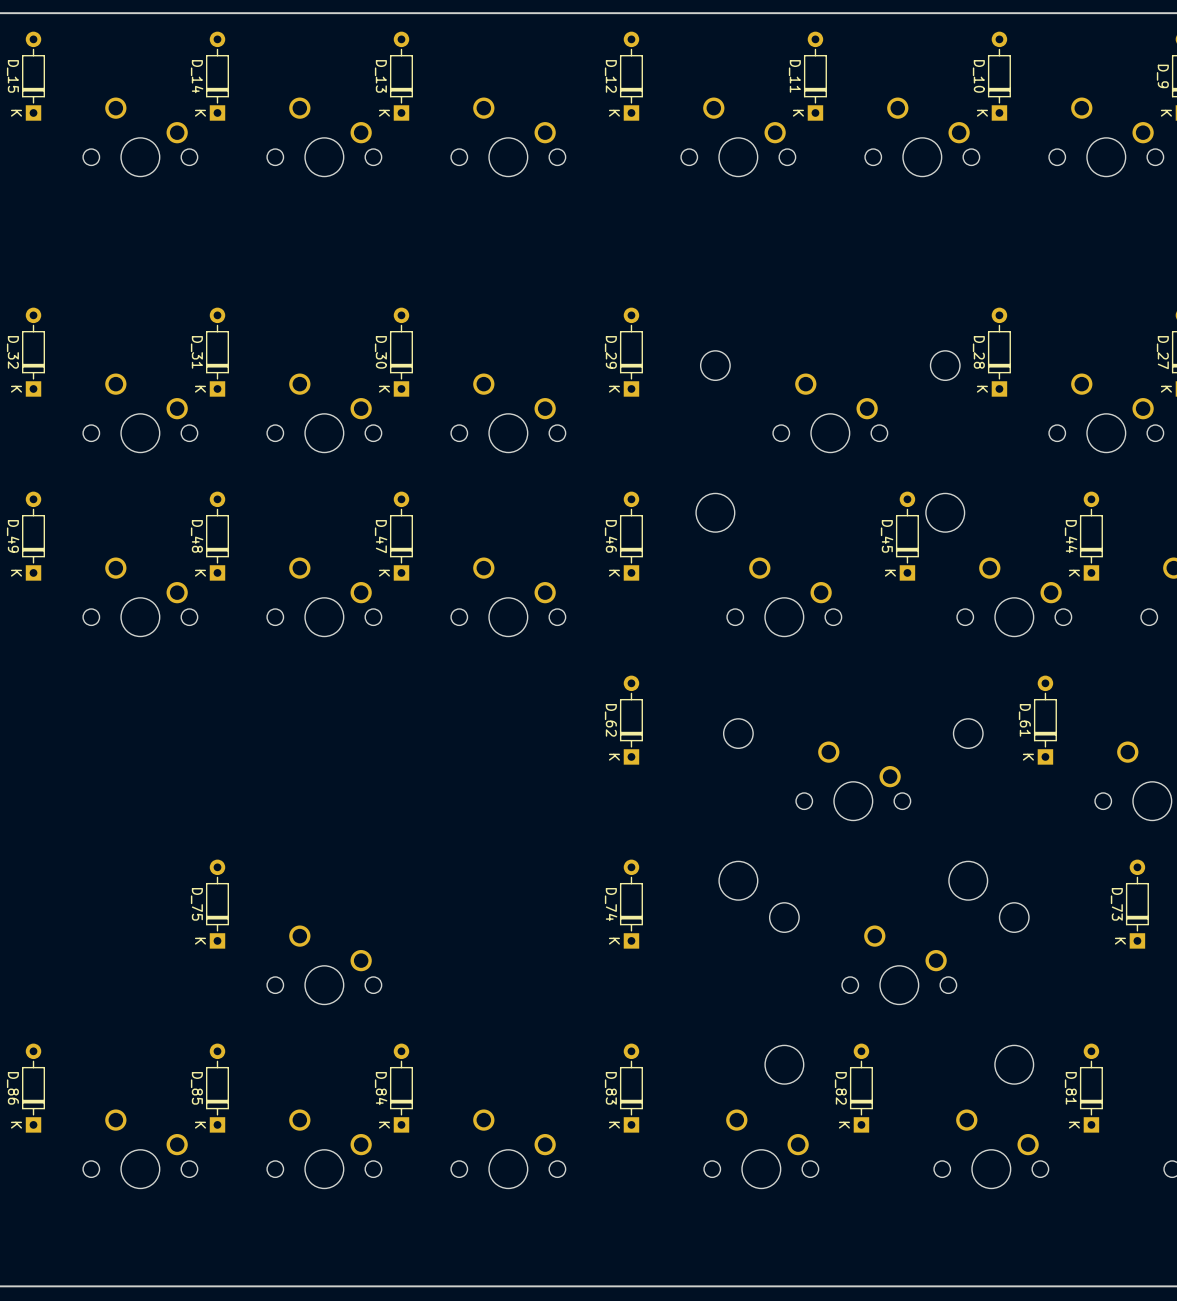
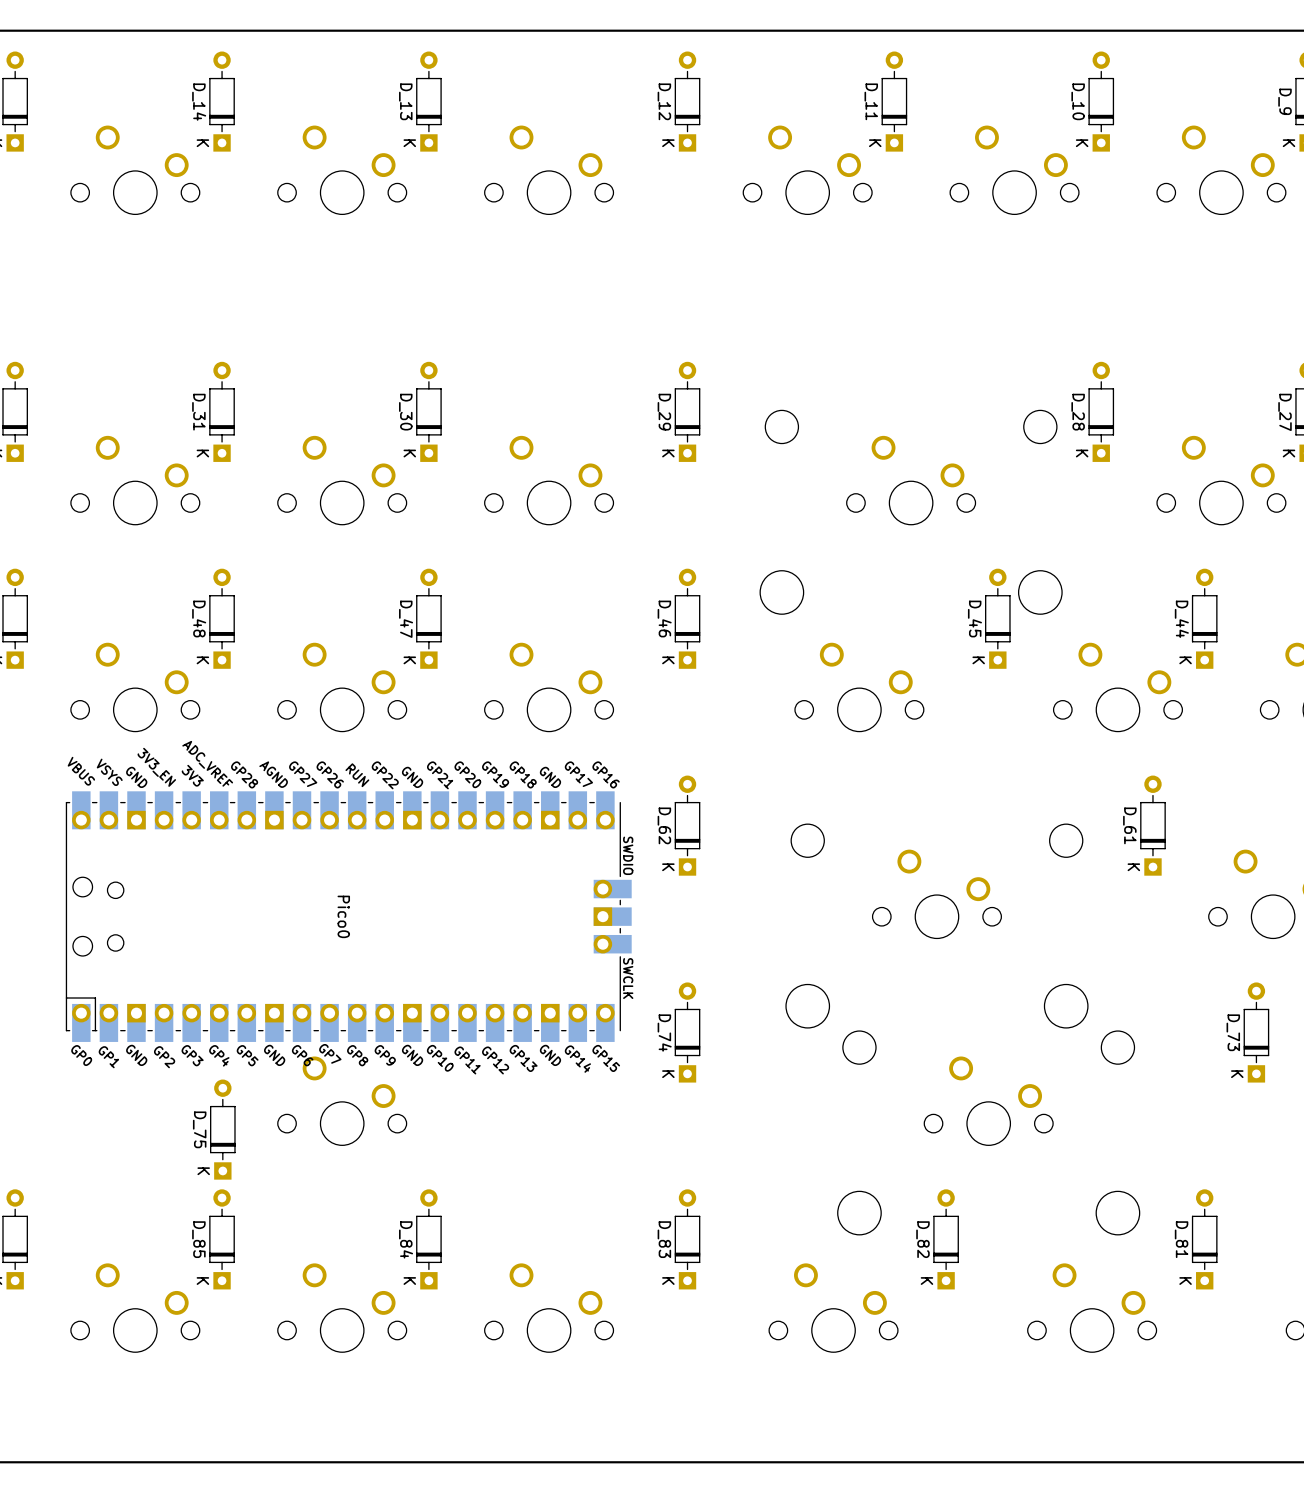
Pico0: none -> (348, 916)
D_75 position: (217, 904) -> (222, 1129)

